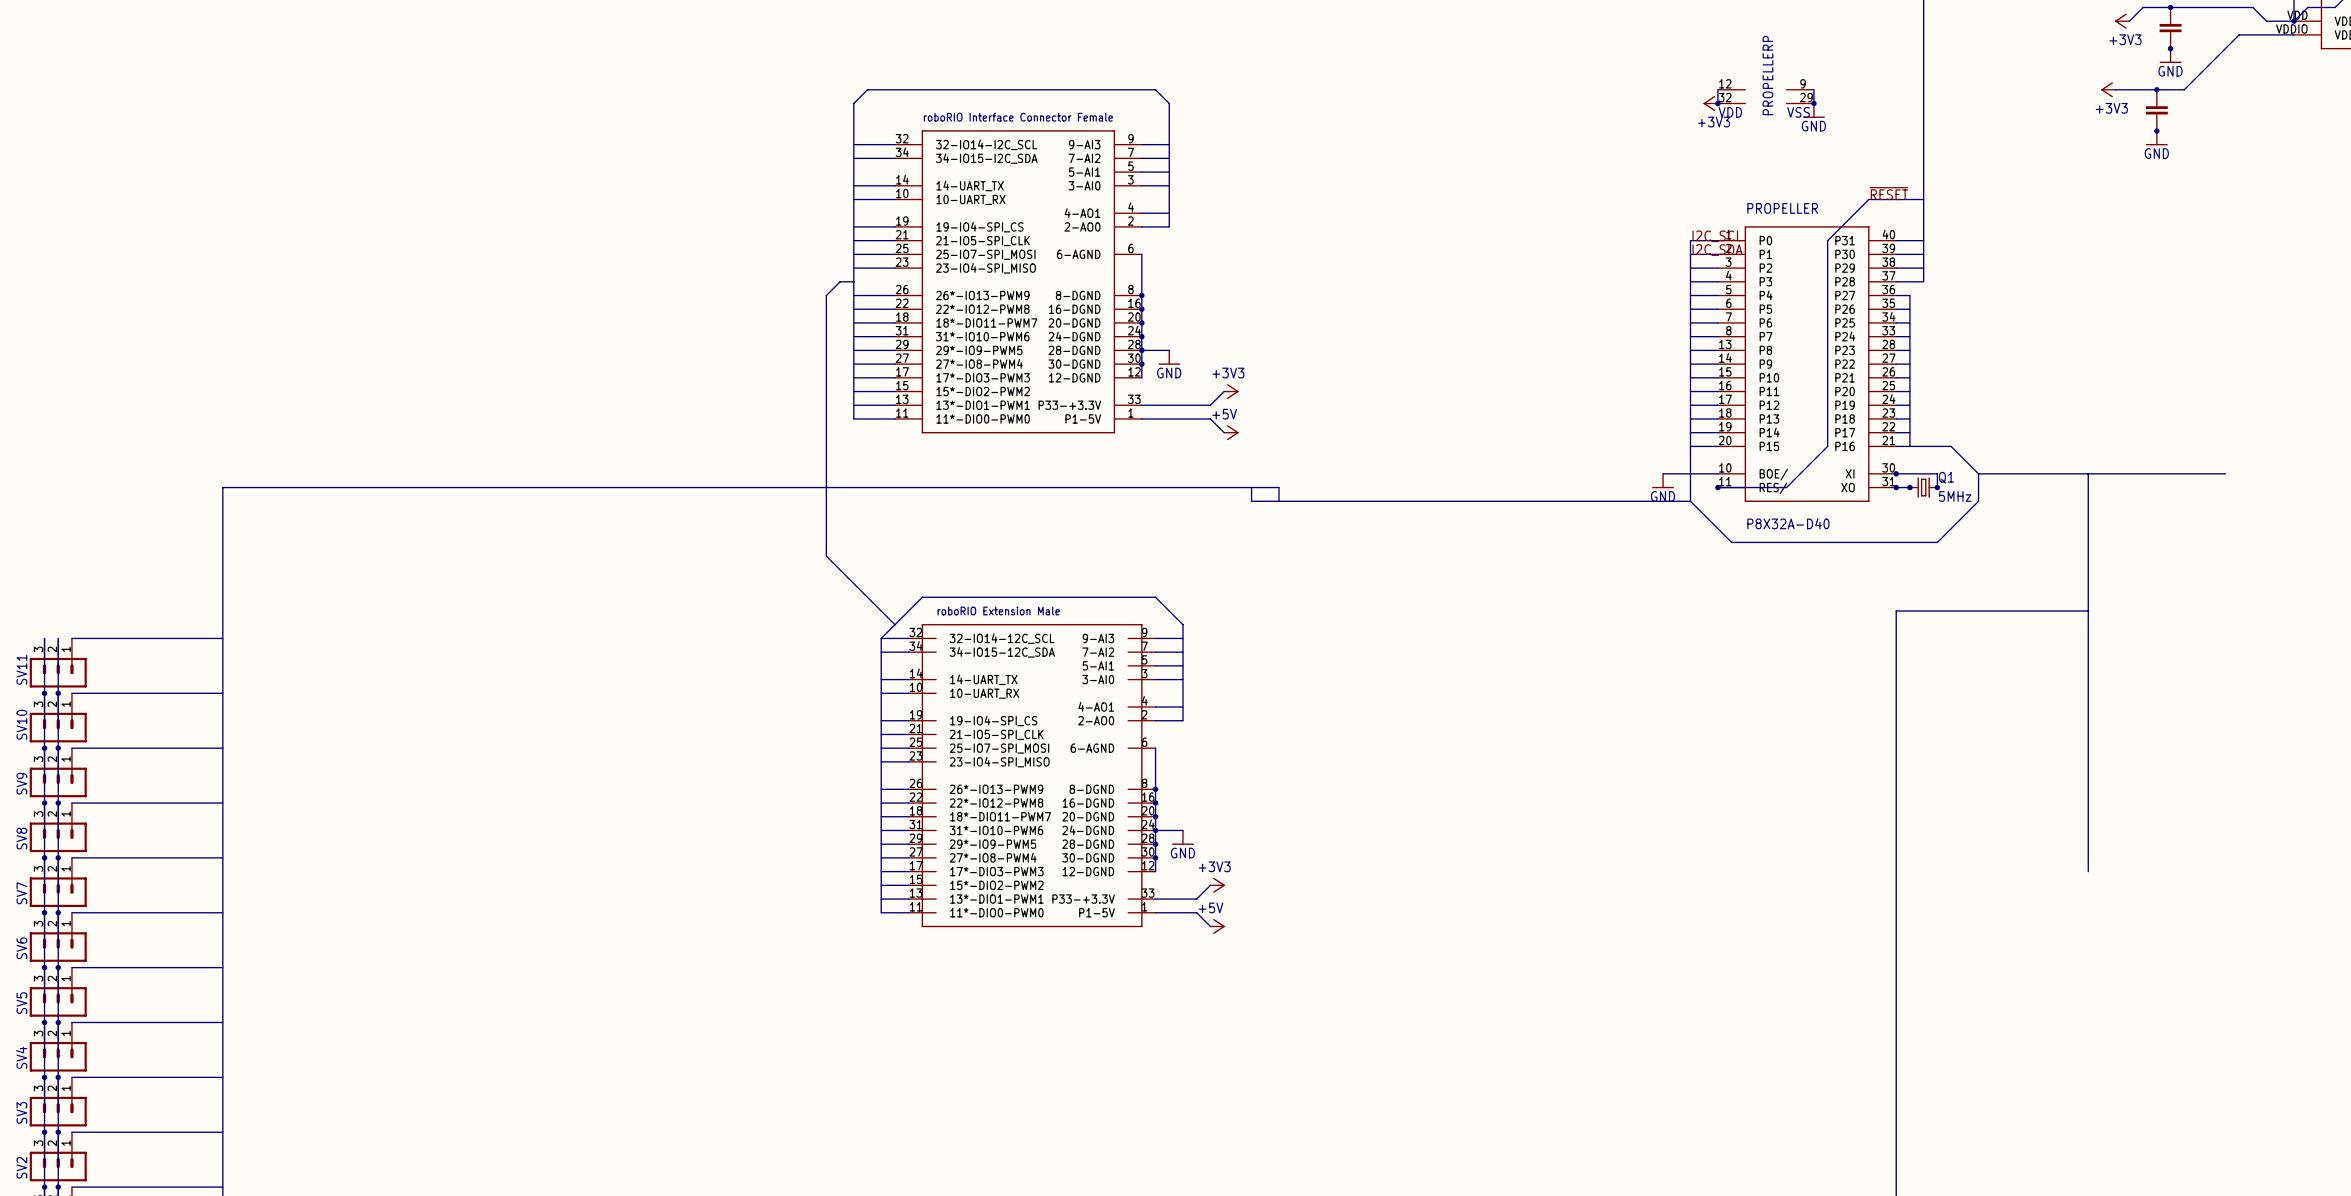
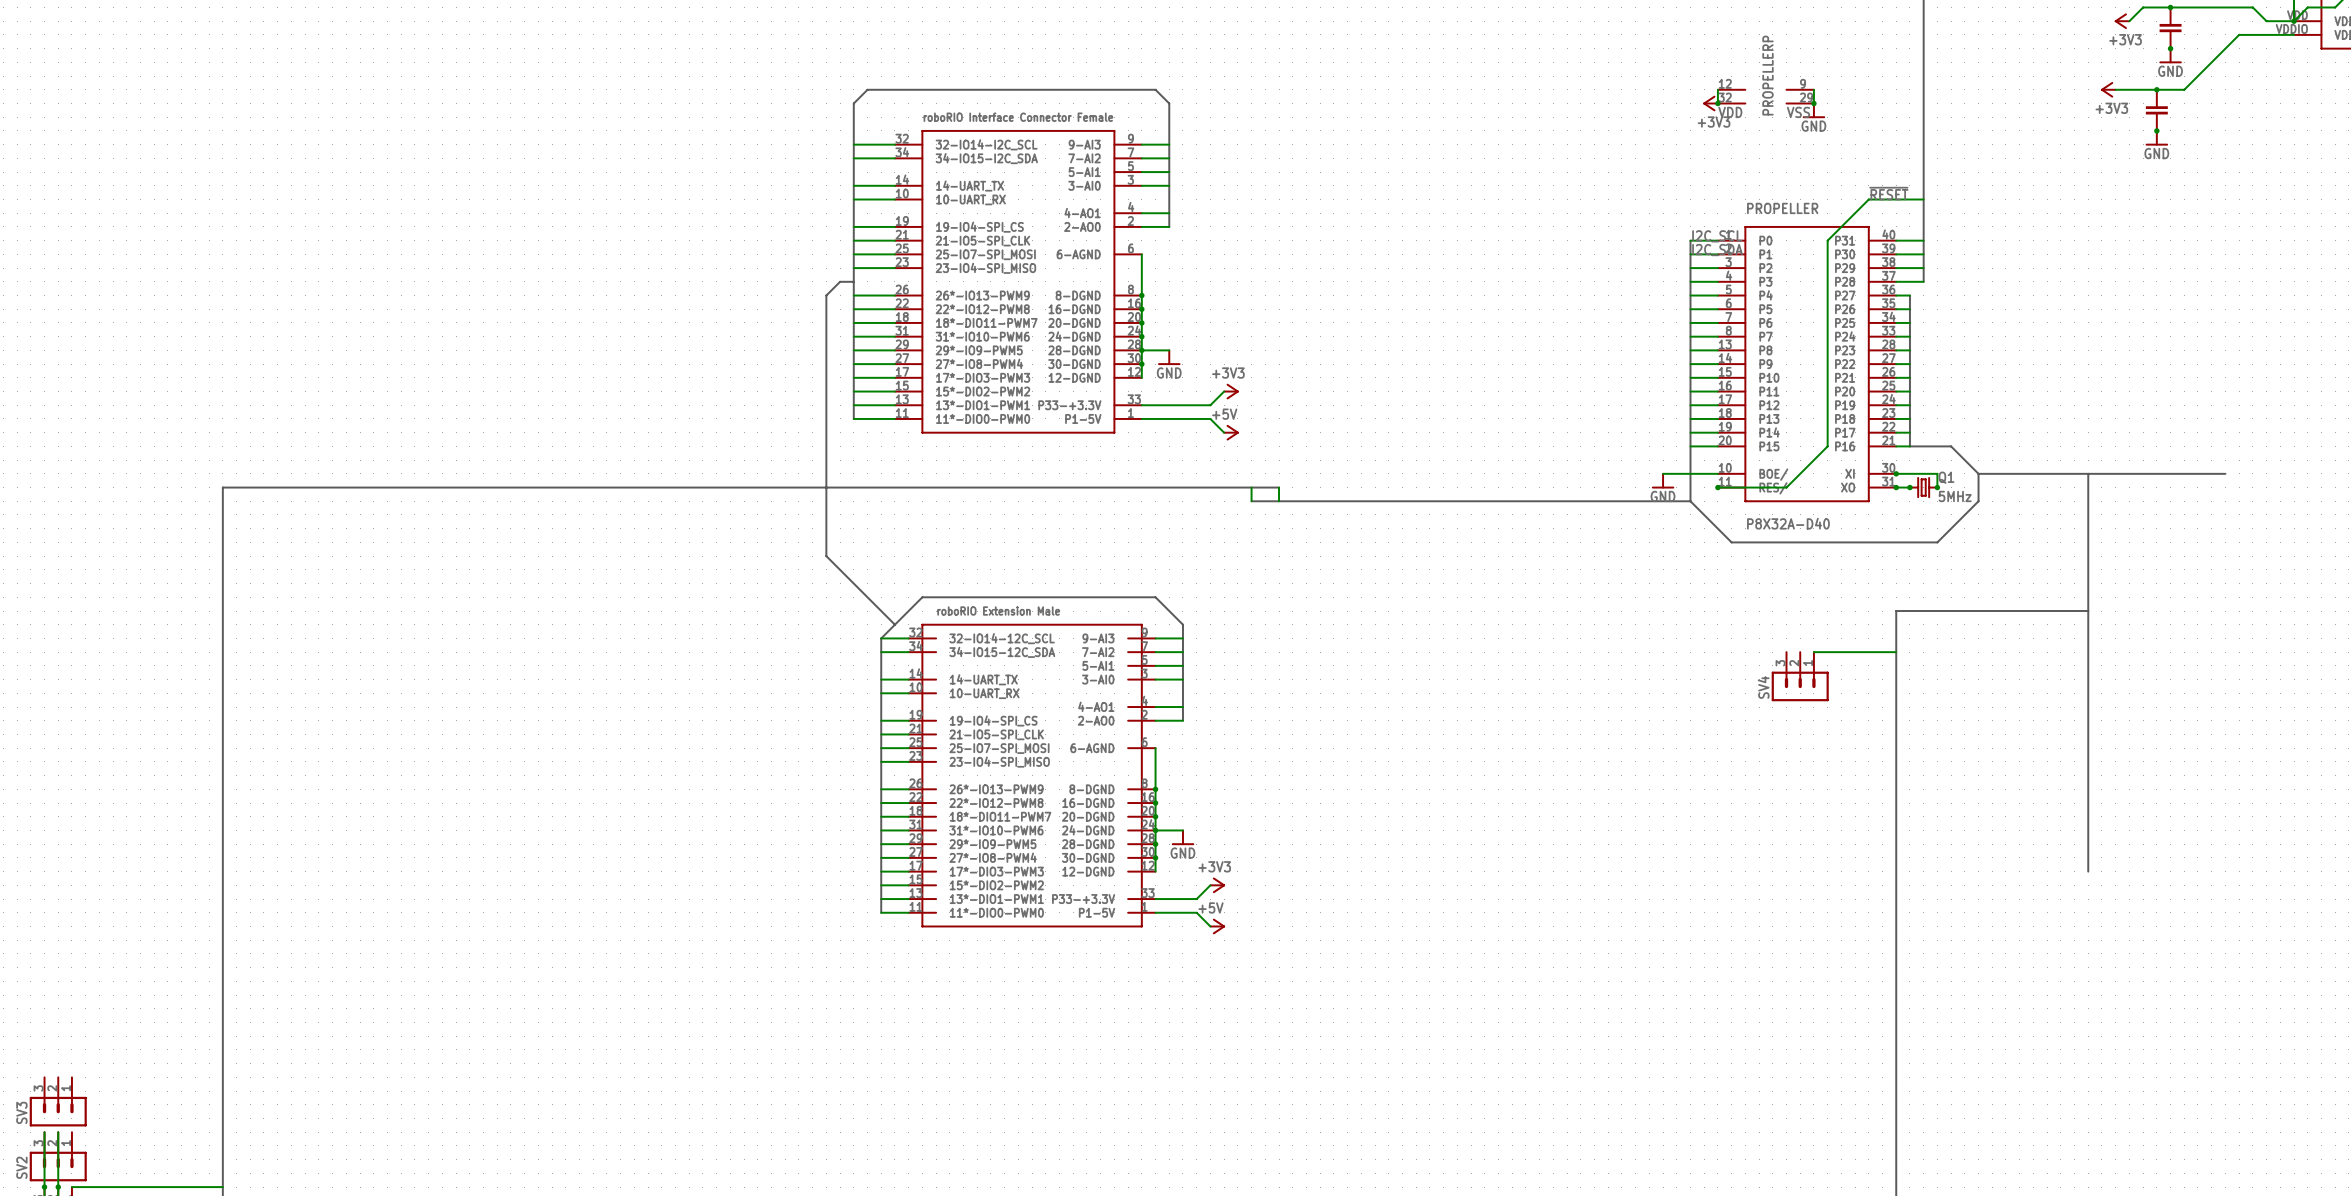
wire: (44, 638) (44, 1132) -> none
wire: (58, 638) (58, 1132) -> none
wire: (71, 638) (222, 638) -> none
wire: none -> (1813, 652) (1896, 652)
SV11: (58, 662) -> none
junction: (44, 693) -> none
junction: (58, 693) -> none
wire: (71, 693) (222, 693) -> none
SV10: (58, 717) -> none
junction: (44, 748) -> none
junction: (58, 748) -> none
wire: (71, 748) (222, 748) -> none
SV9: (58, 772) -> none
junction: (44, 803) -> none
junction: (58, 803) -> none
wire: (71, 803) (222, 803) -> none
SV8: (58, 827) -> none
junction: (44, 857) -> none
junction: (58, 857) -> none
wire: (71, 857) (222, 857) -> none
SV7: (58, 882) -> none
junction: (44, 912) -> none
junction: (58, 912) -> none
wire: (71, 912) (222, 912) -> none
SV6: (58, 937) -> none
junction: (44, 967) -> none
junction: (58, 967) -> none
wire: (71, 967) (222, 967) -> none
SV5: (58, 992) -> none
junction: (44, 1022) -> none
junction: (58, 1022) -> none
wire: (71, 1022) (222, 1022) -> none
SV4 position: (58, 1047) -> (1800, 676)
junction: (44, 1077) -> none
junction: (58, 1077) -> none
wire: (71, 1077) (222, 1077) -> none
junction: (44, 1132) -> none
junction: (58, 1132) -> none
wire: (71, 1132) (222, 1132) -> none

